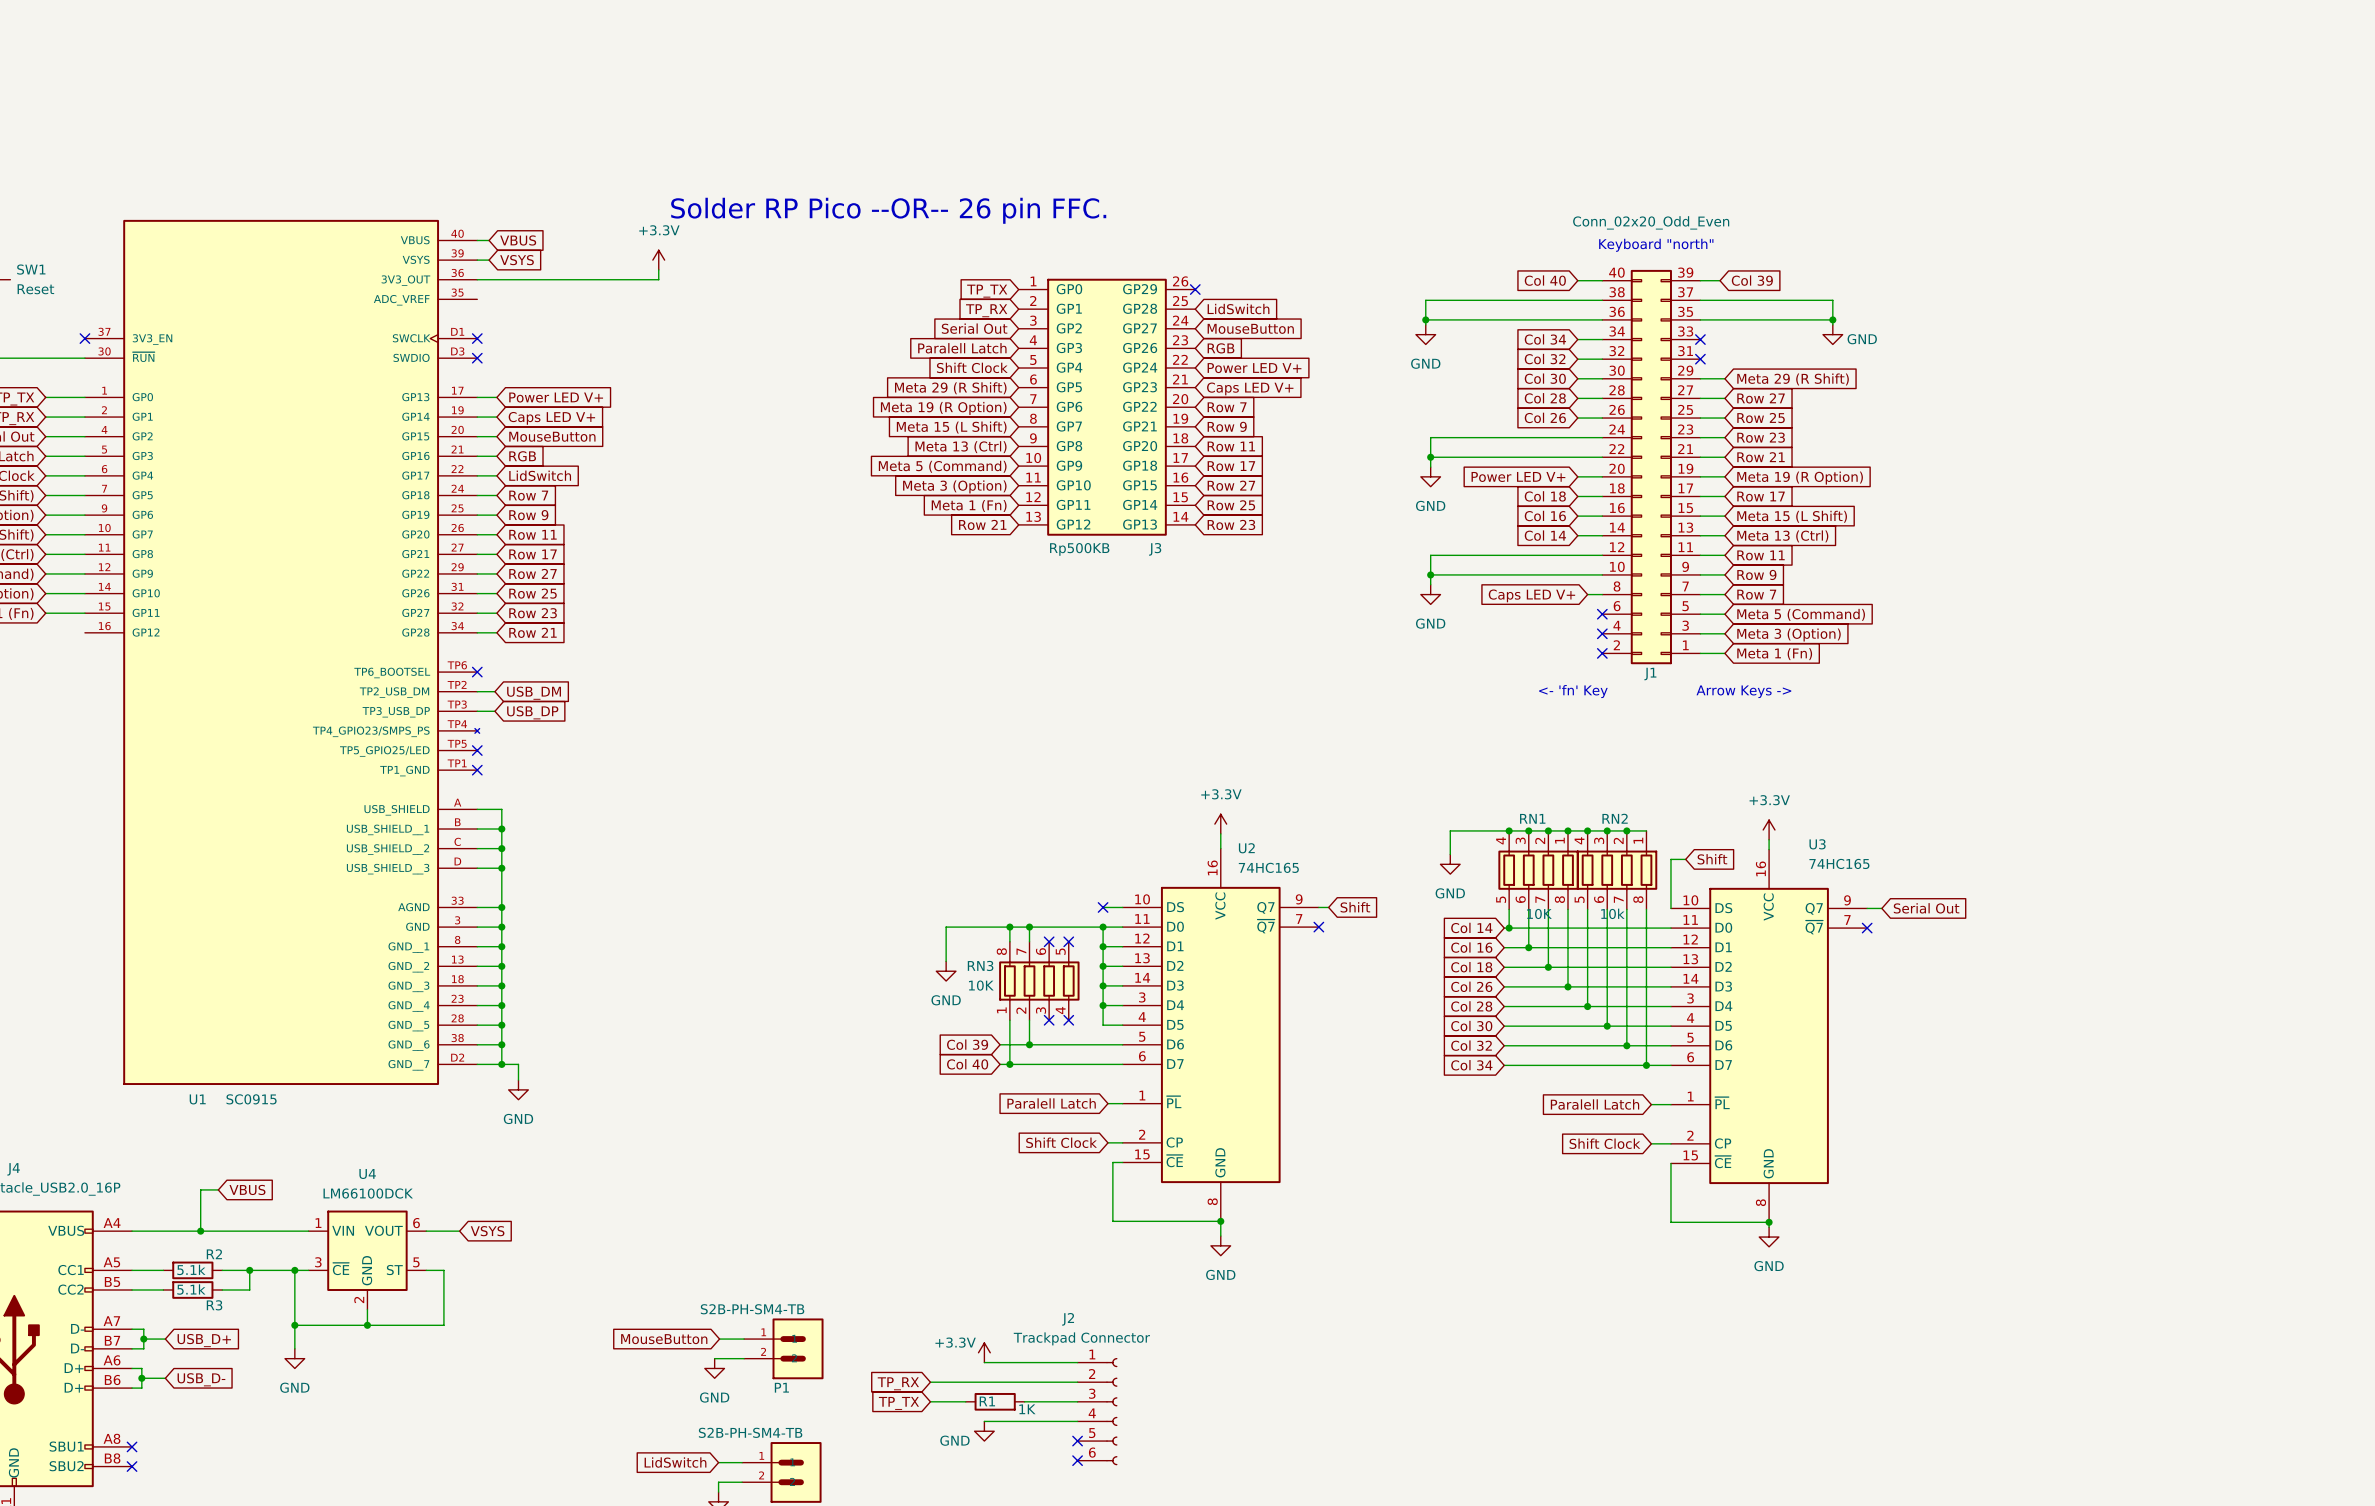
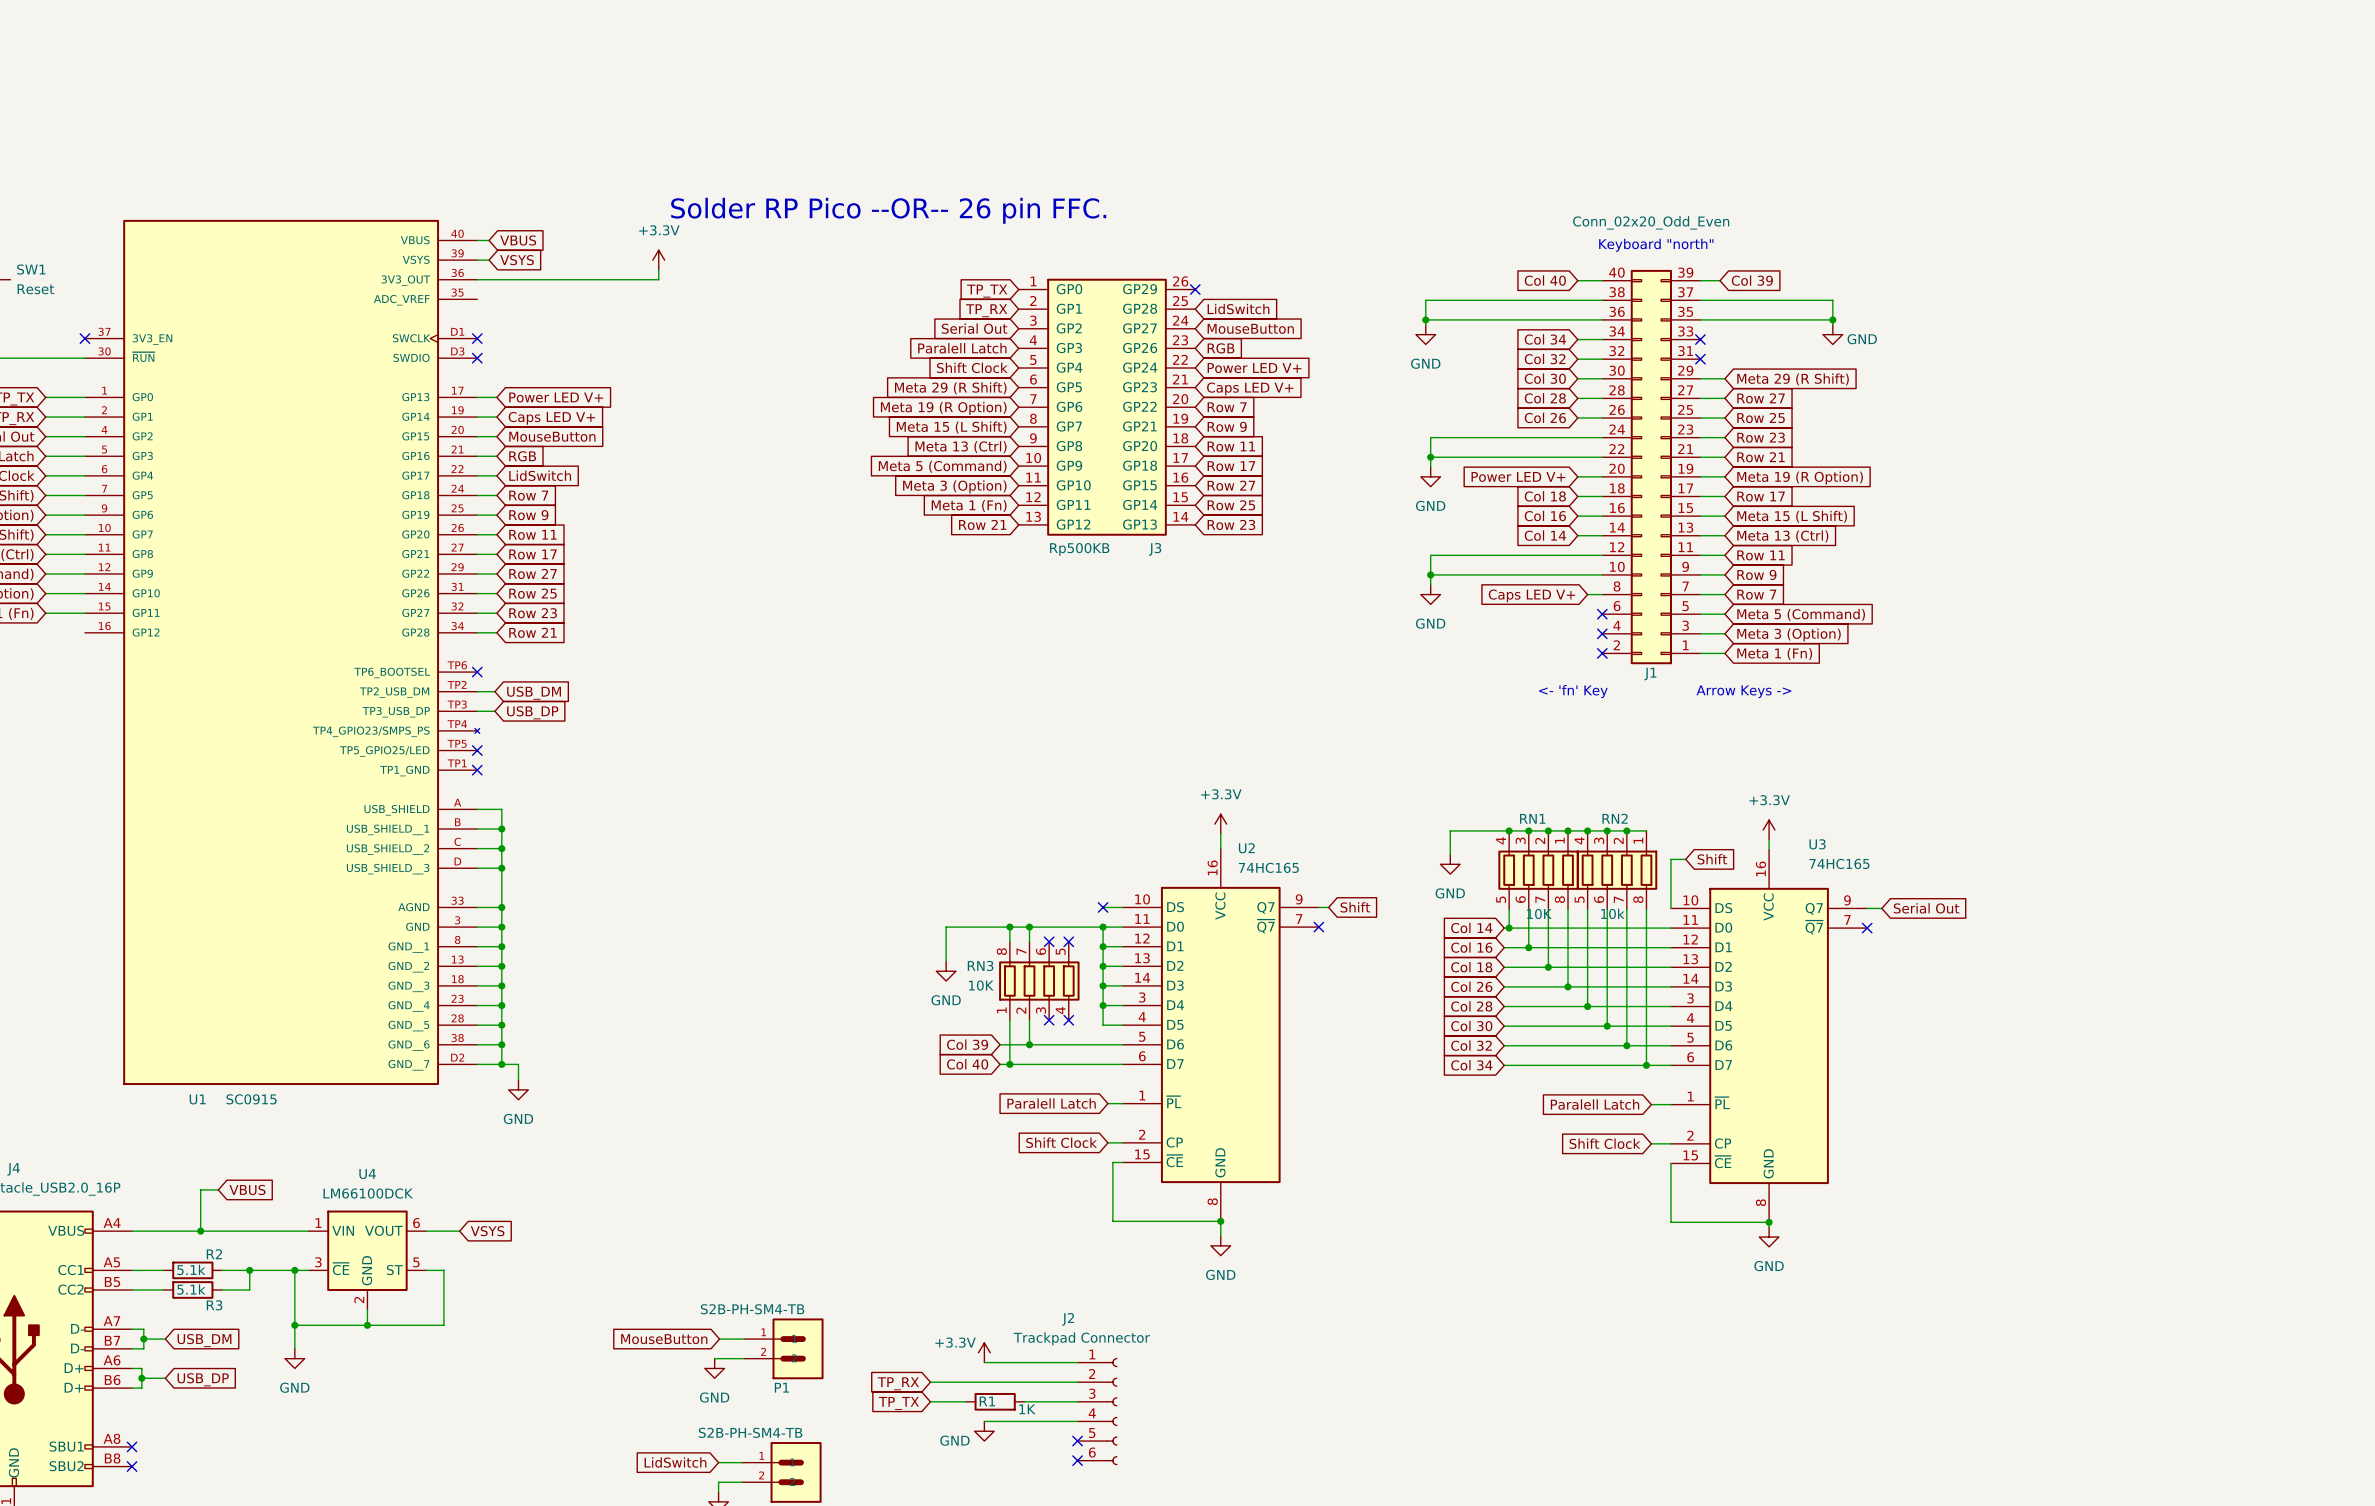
global label: USB_D+ (204, 1340) -> USB_DM (204, 1340)
global label: USB_D- (201, 1379) -> USB_DP (203, 1379)

